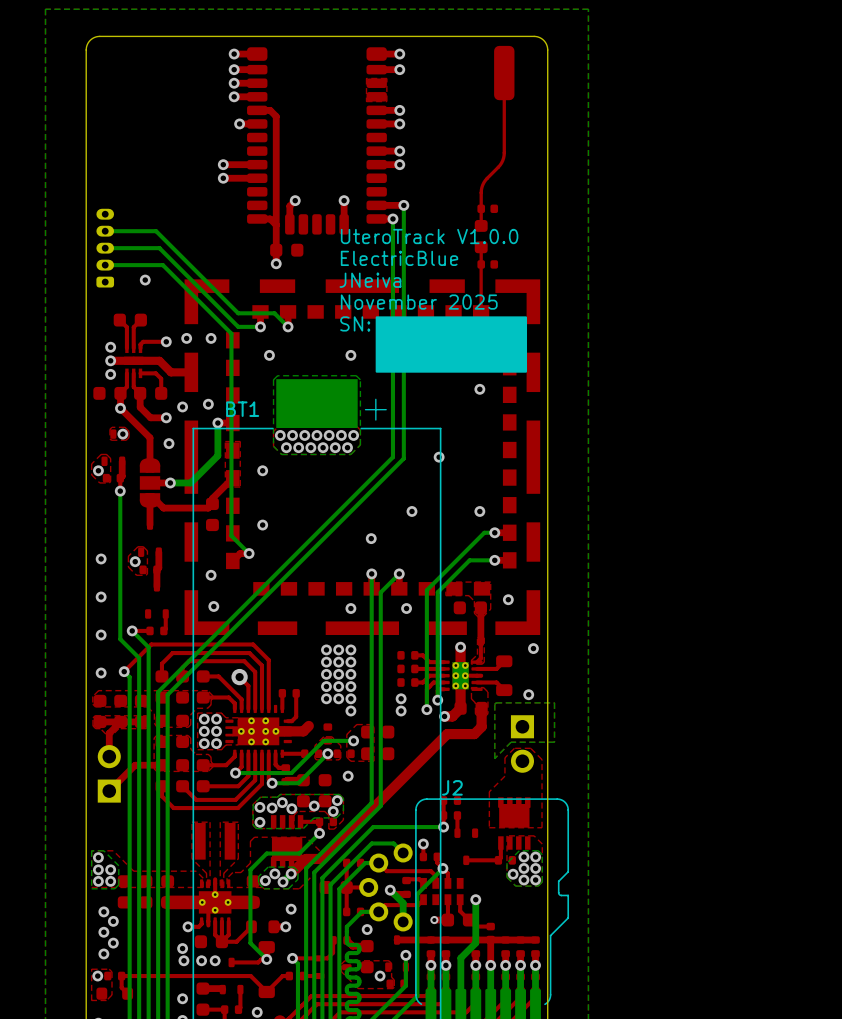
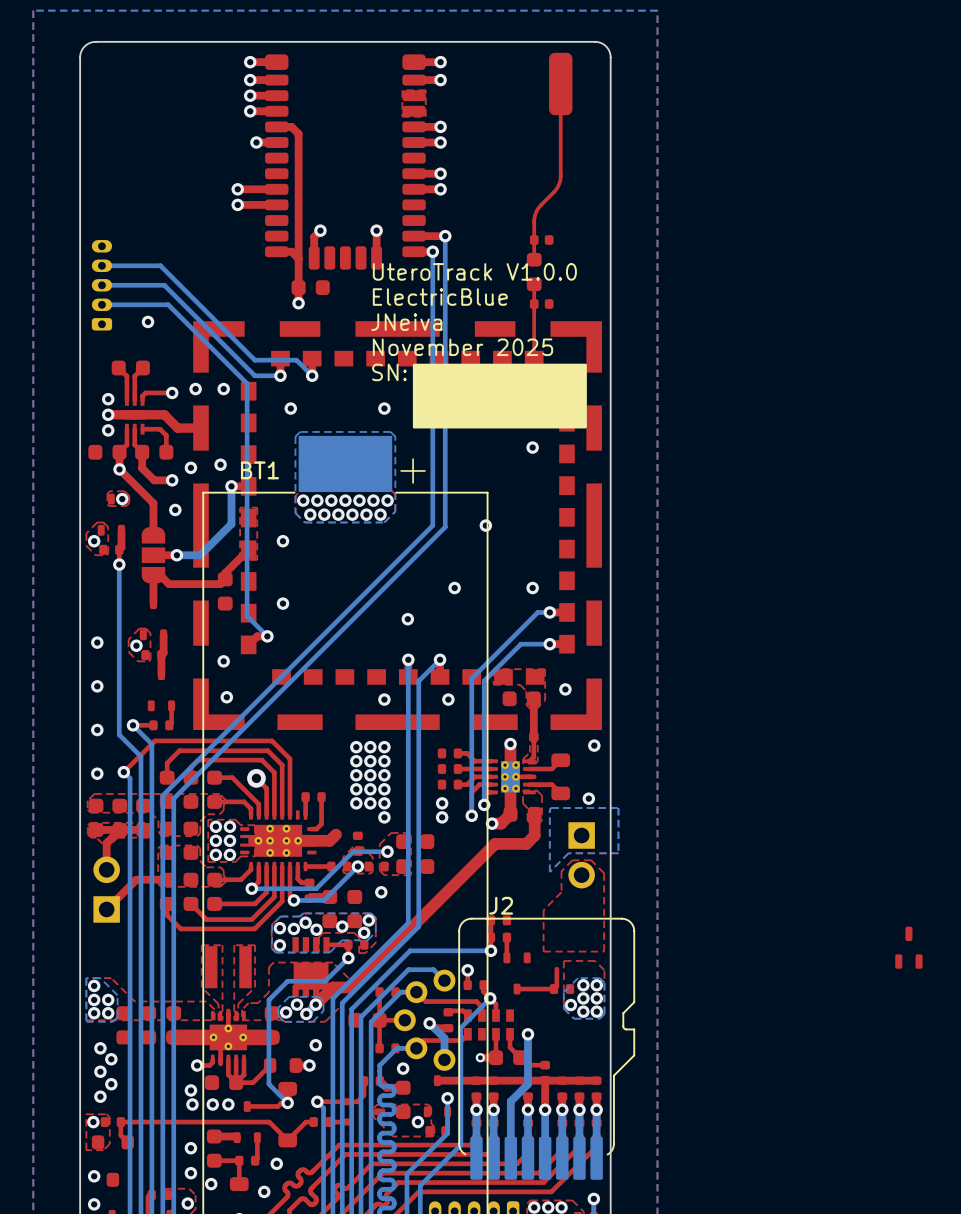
part: (514, 823) -> none
part: none -> (908, 947)

